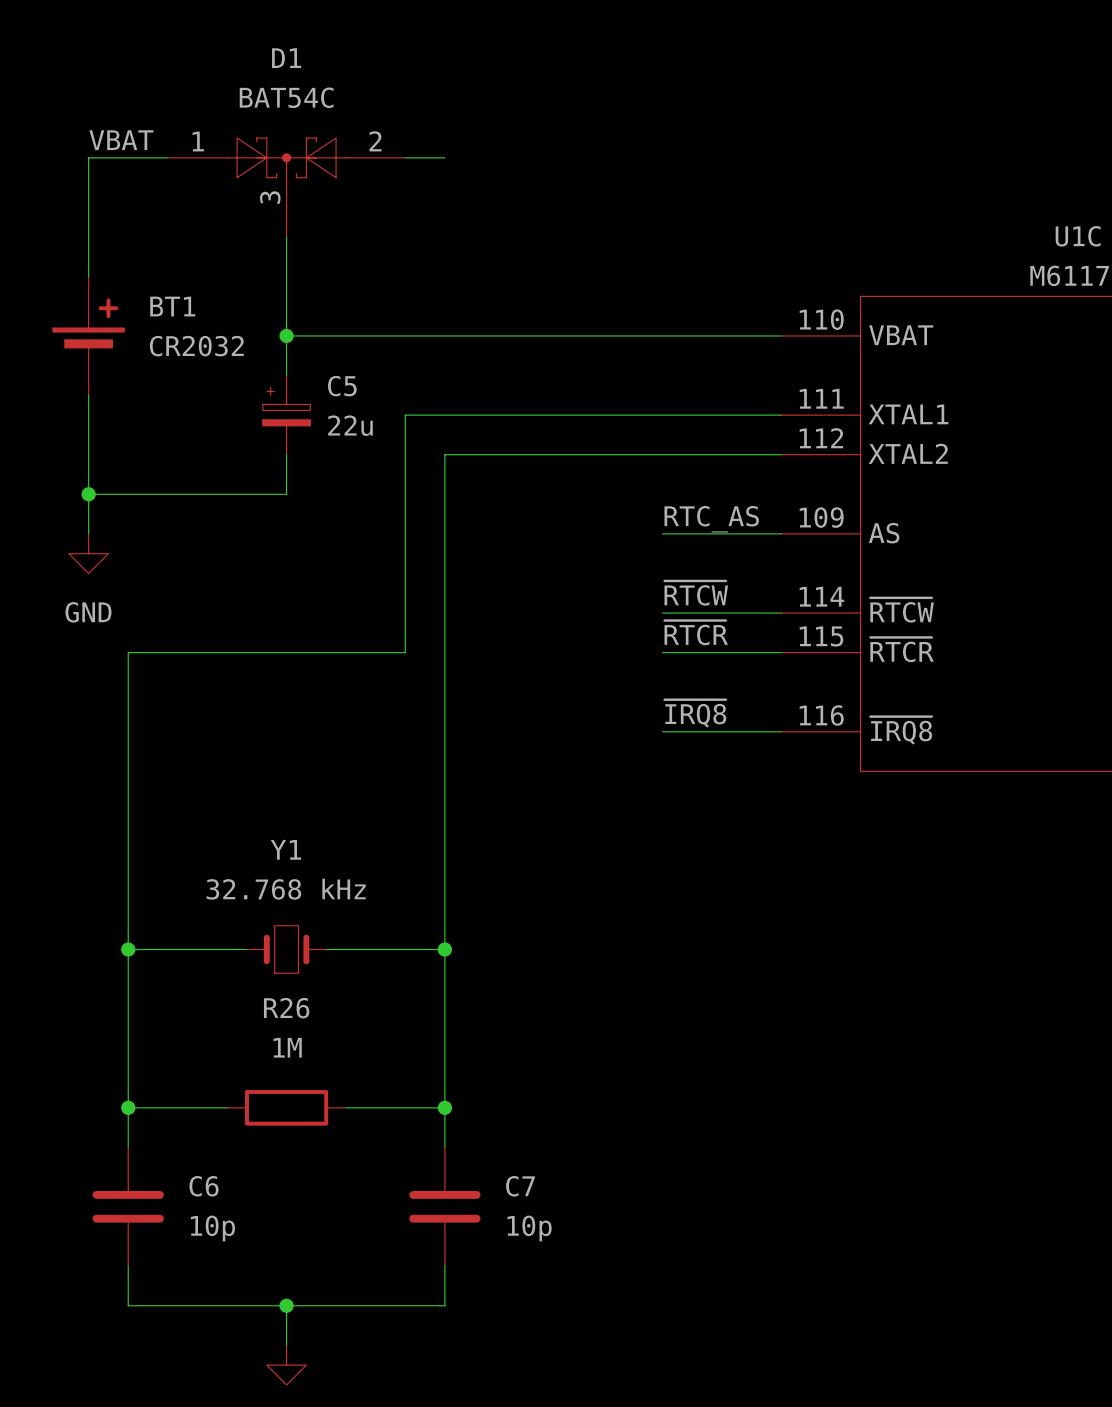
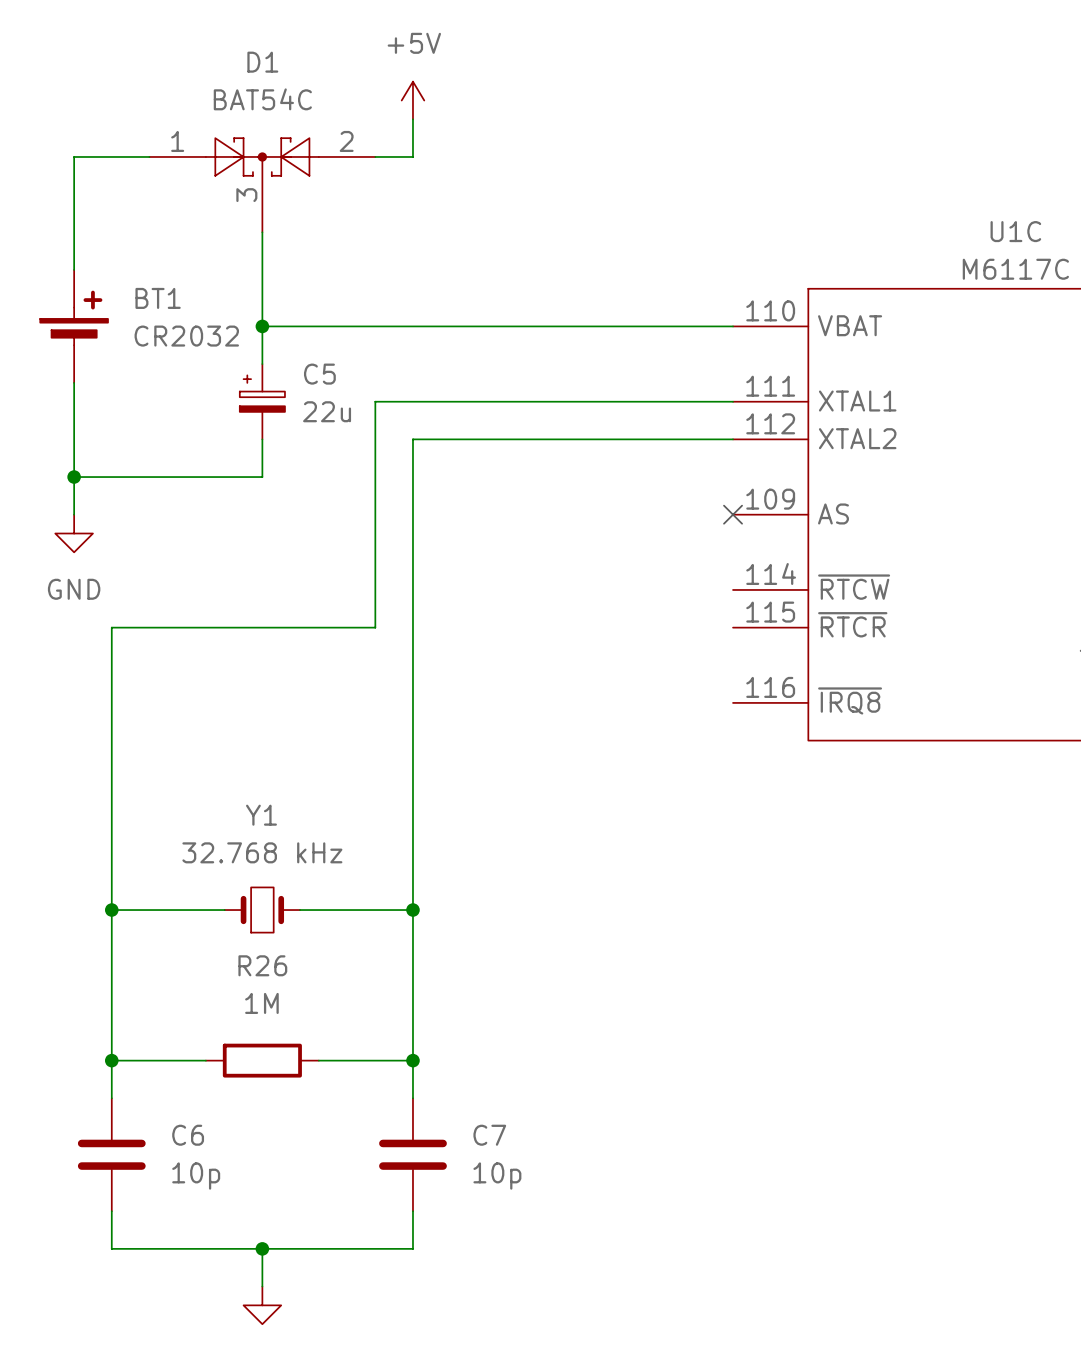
power symbol: none -> +5V (412, 100)
wire: none -> (412, 119) (412, 156)
label: VBAT (121, 140) -> none
label: RTC_AS (711, 519) -> none
wire: (662, 533) (781, 533) -> none
no-connect mark: none -> (733, 514)
label: ~{RTCW} (696, 593) -> none
wire: (662, 613) (781, 613) -> none
label: ~{RTCR} (696, 632) -> none
wire: (662, 652) (781, 652) -> none
label: ~{IRQ8} (695, 713) -> none
wire: (662, 731) (781, 731) -> none

